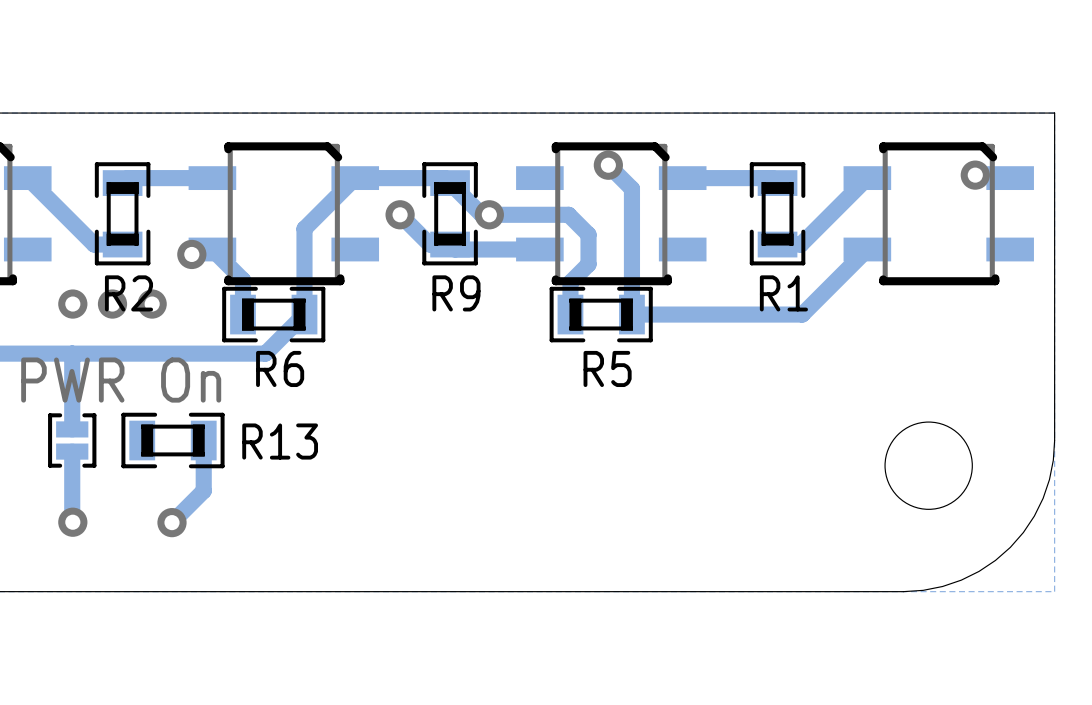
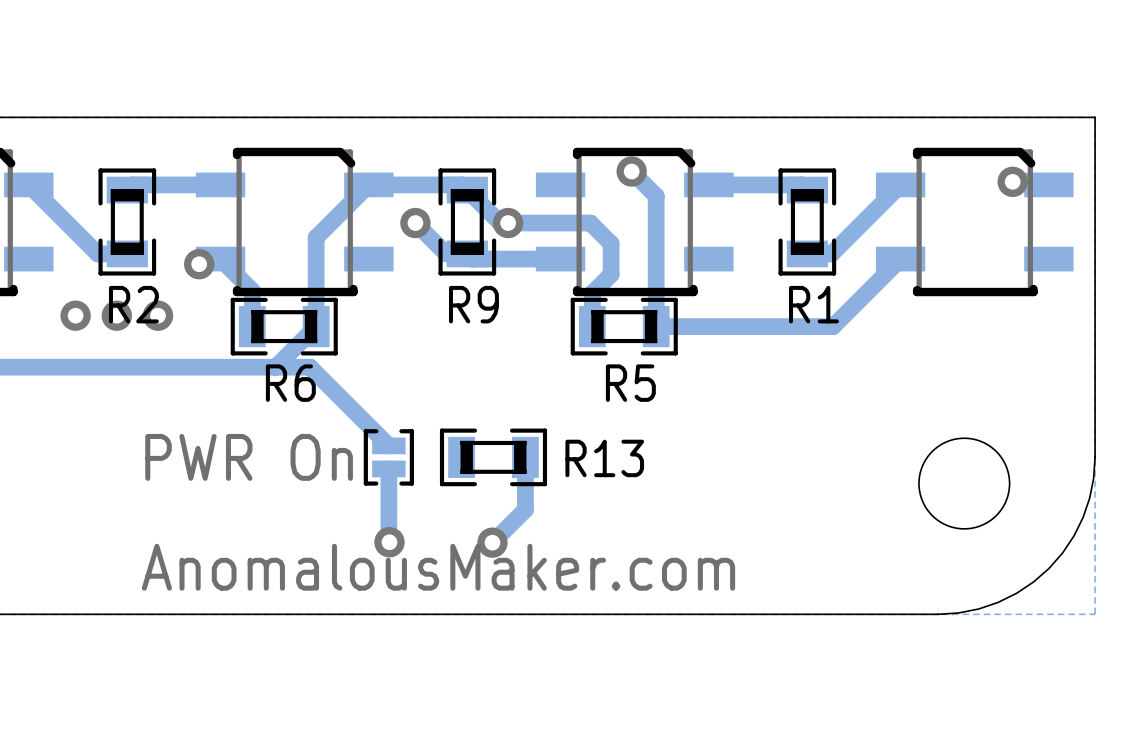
track: (72, 353) (72, 429) -> none
track: none -> (275, 367) (310, 367) (388, 445)
text position: PWR On (121, 380) -> PWR On (249, 457)
part position: (72, 440) -> (388, 457)
R13 position: (172, 440) -> (493, 457)
track: (203, 440) (203, 490) (172, 522) -> (525, 457) (525, 509) (492, 542)
track: (72, 451) (72, 522) -> (388, 468) (389, 542)
via: (72, 522) -> none
via: (172, 522) -> none
via: none -> (389, 542)
via: none -> (492, 542)
text: none -> AnomalousMaker.com (438, 567)

